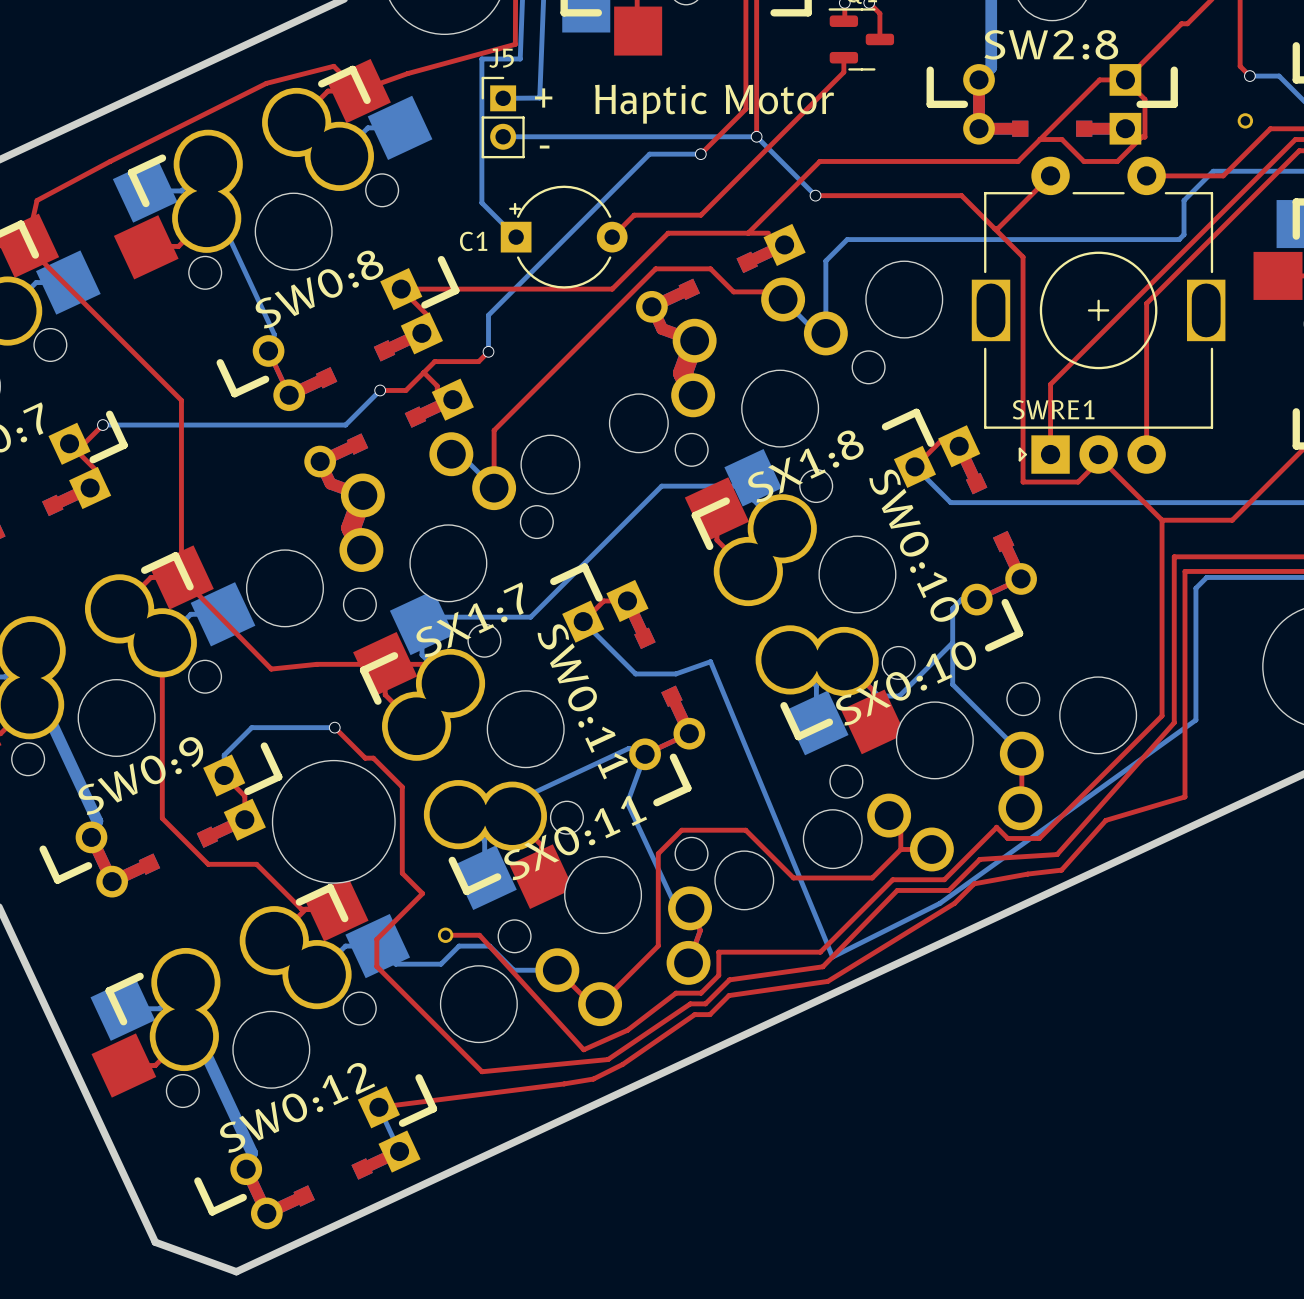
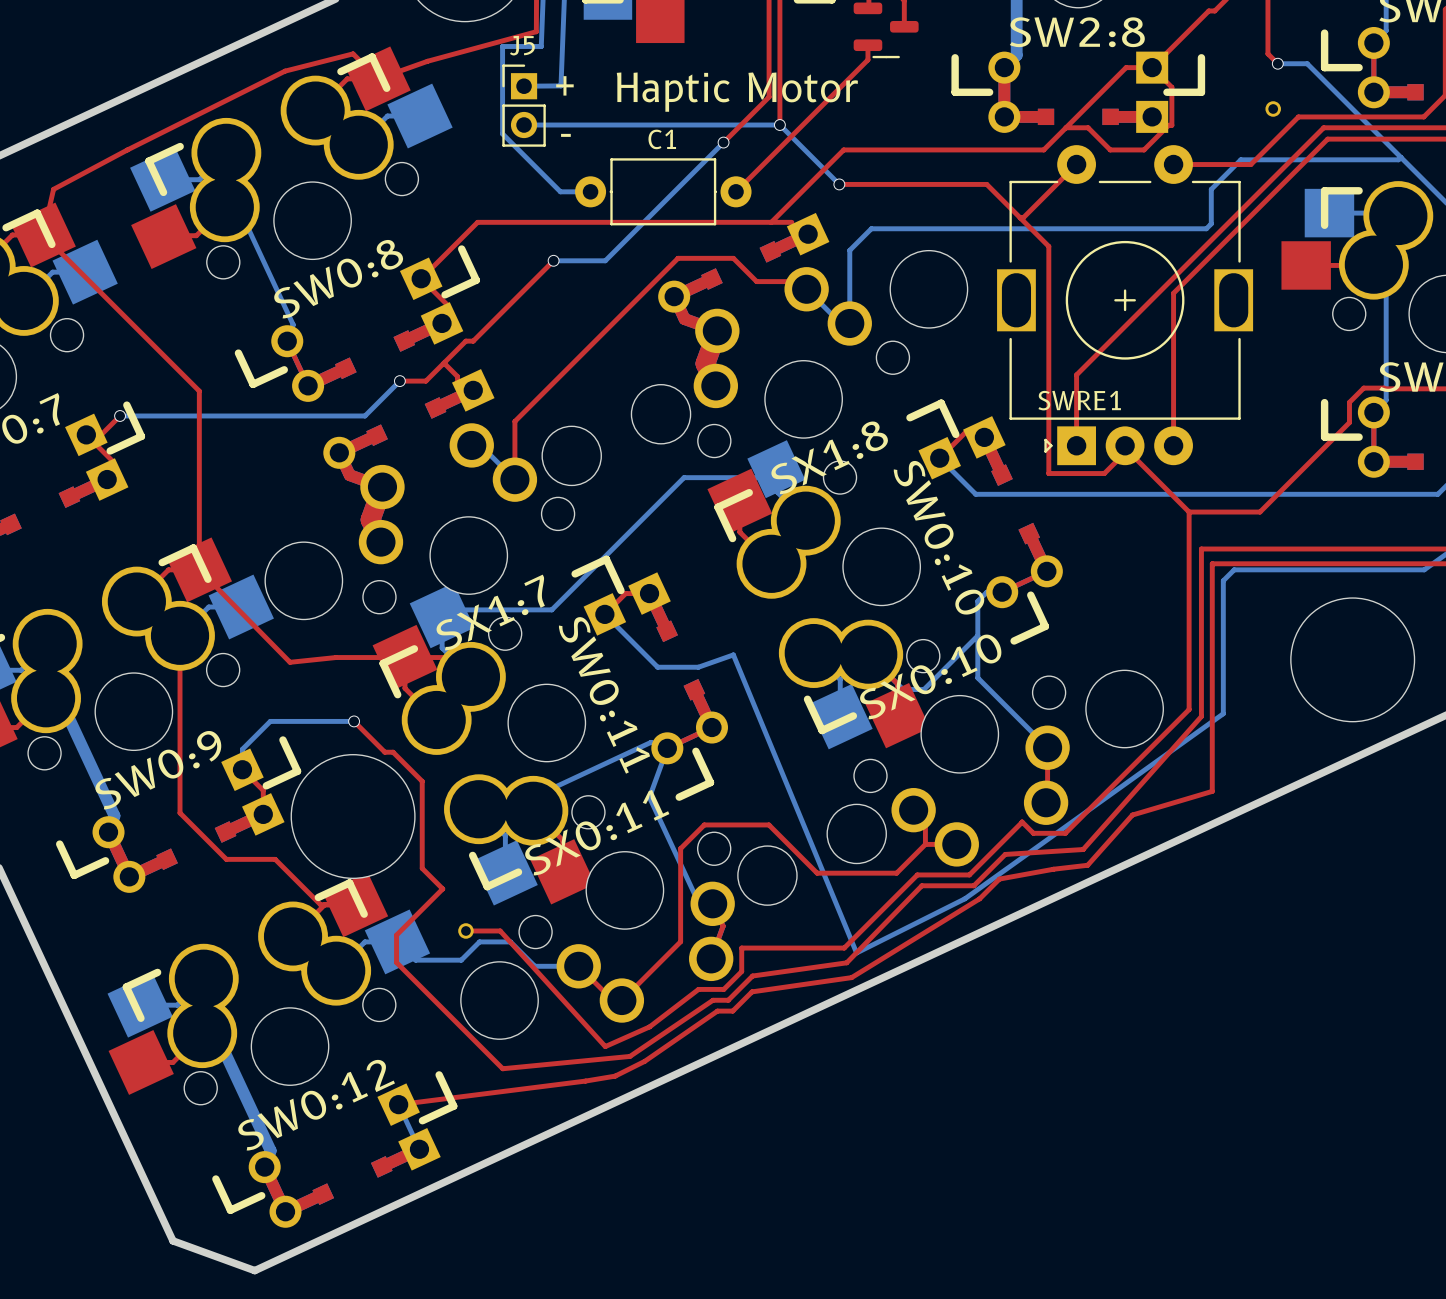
bottom track: (481, 145) (481, 202) (516, 237) -> (502, 133) (560, 191) (590, 191)
bottom track: (700, 154) (649, 154) (488, 315) (488, 351) -> (723, 142) (605, 260) (553, 260)
C1 footprint: [500, 185, 628, 289] -> [575, 158, 752, 226]
top track: (713, 202) (700, 215) (634, 215) (612, 237) -> none
top track: (668, 233) (612, 289) (401, 289) -> (690, 222) (477, 222) (421, 278)
C1 name position: C1 (473, 241) -> C1 (662, 139)
top track: (488, 351) (478, 361) (434, 361) -> (553, 260) (473, 341) (465, 341) (455, 351)
via position: (488, 351) -> (553, 260)

